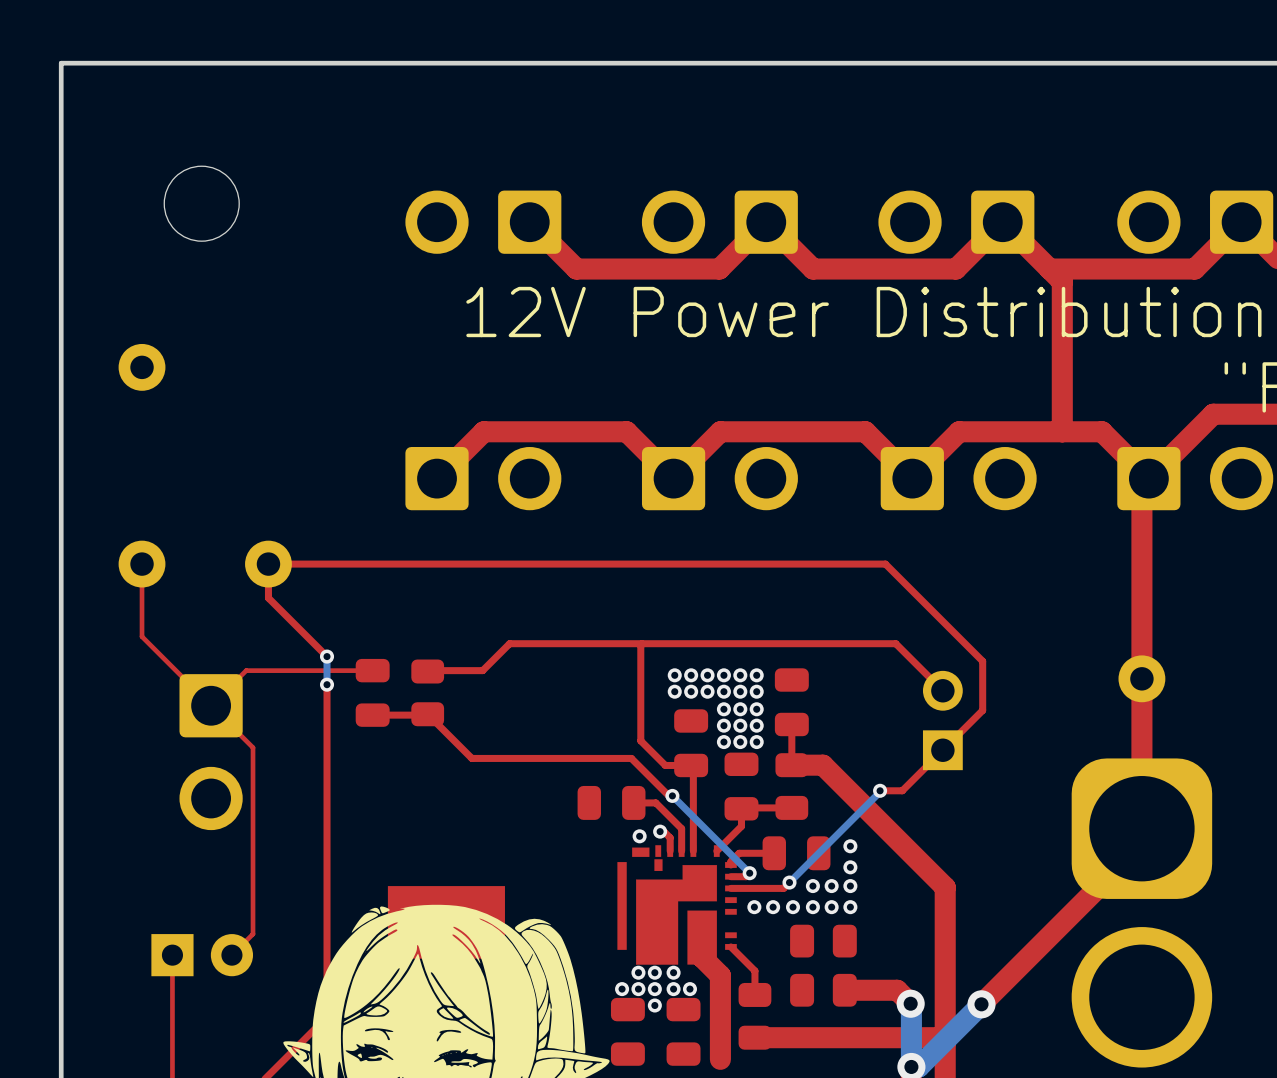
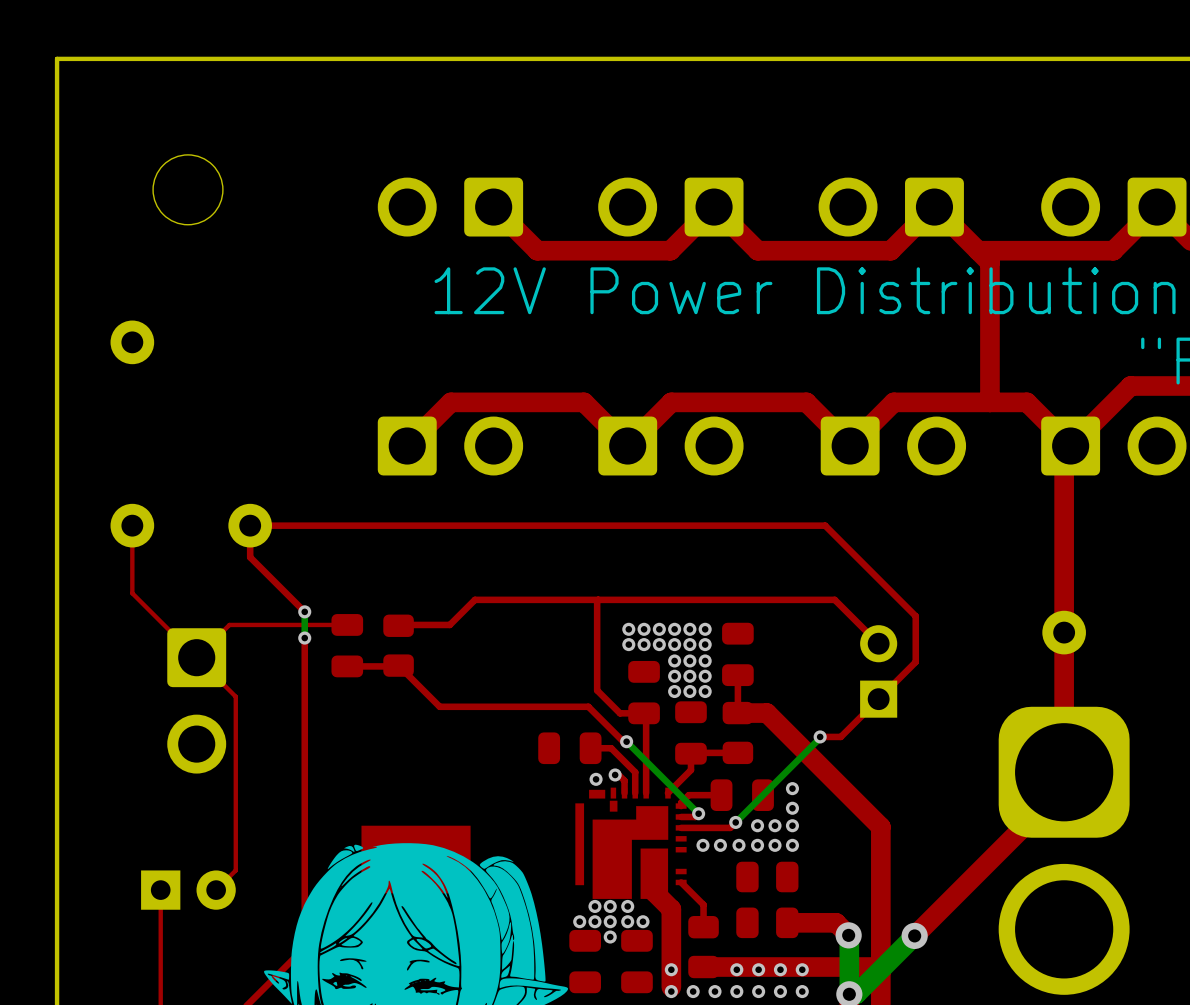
via: none -> (671, 969)
via: none -> (736, 969)
via: none -> (758, 969)
via: none -> (780, 969)
via: none -> (802, 969)
via: none -> (671, 991)
via: none -> (693, 991)
via: none -> (714, 991)
via: none -> (736, 991)
via: none -> (758, 991)
via: none -> (780, 991)
via: none -> (802, 991)

